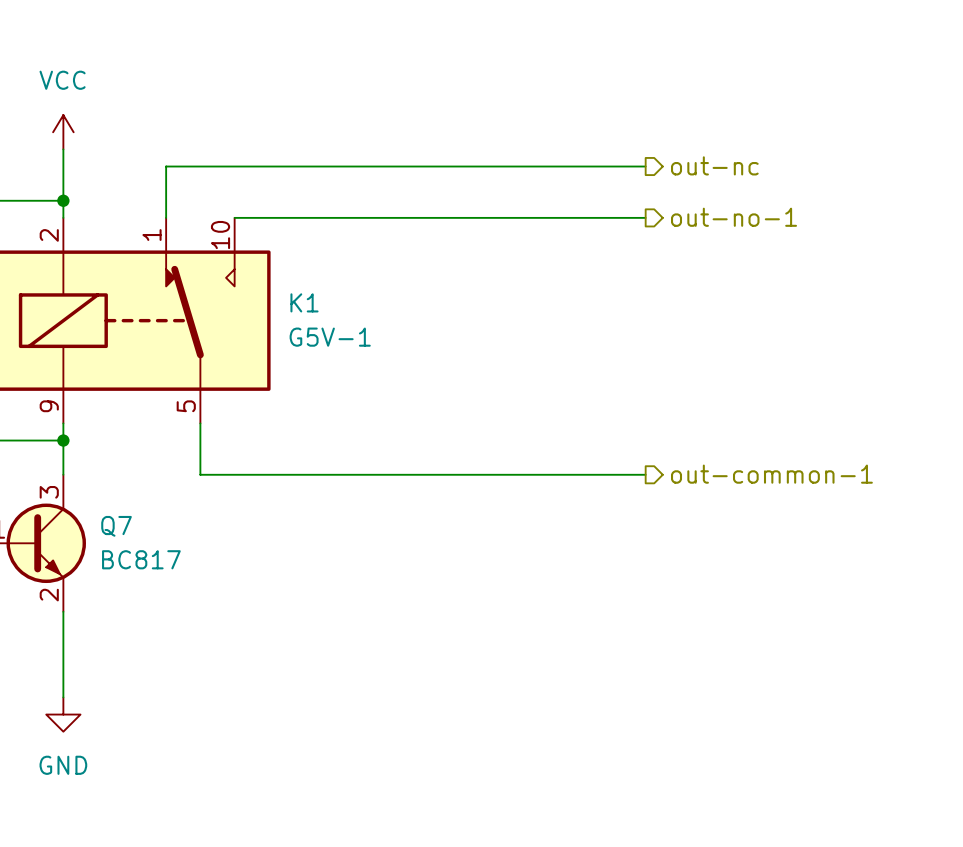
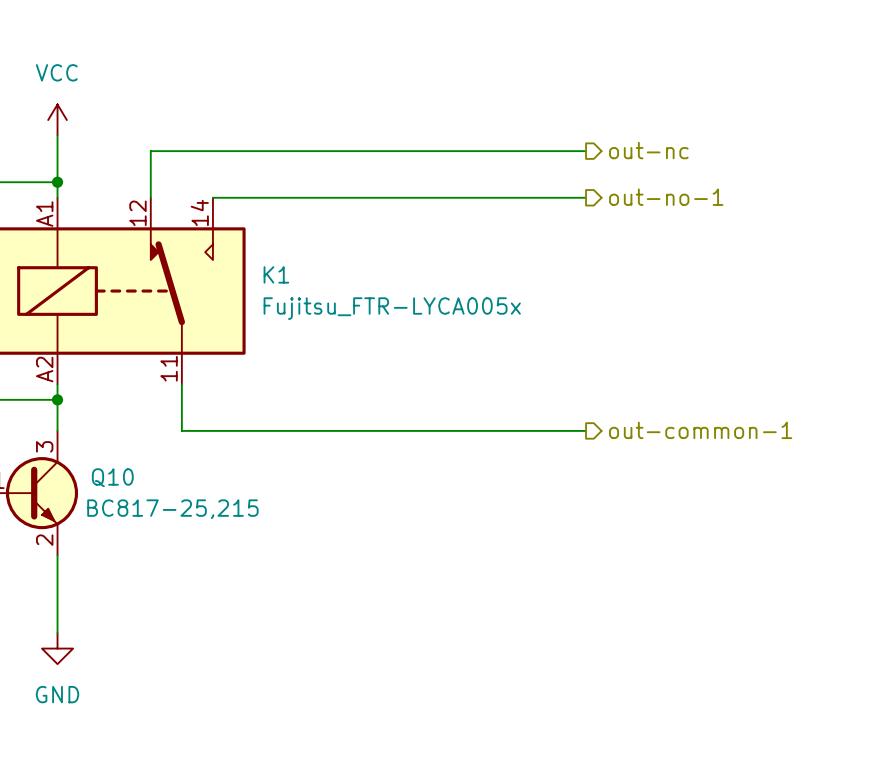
K1 pin number: 2 (49, 235) -> A1 (44, 214)
K1 pin number: 1 (152, 235) -> 12 (137, 213)
K1 pin number: 10 (220, 235) -> 14 (199, 212)
K1 value: G5V-1 (330, 337) -> Fujitsu_FTR-LYCA005x (392, 308)
K1 pin number: 9 (49, 406) -> A2 (44, 369)
K1 pin number: 5 (186, 406) -> 11 (169, 368)
Q7 name: Q7 (116, 526) -> Q10 (112, 477)
Q7 value: BC817 (141, 559) -> none
Q7 text: none -> BC817-25,215 (172, 509)

